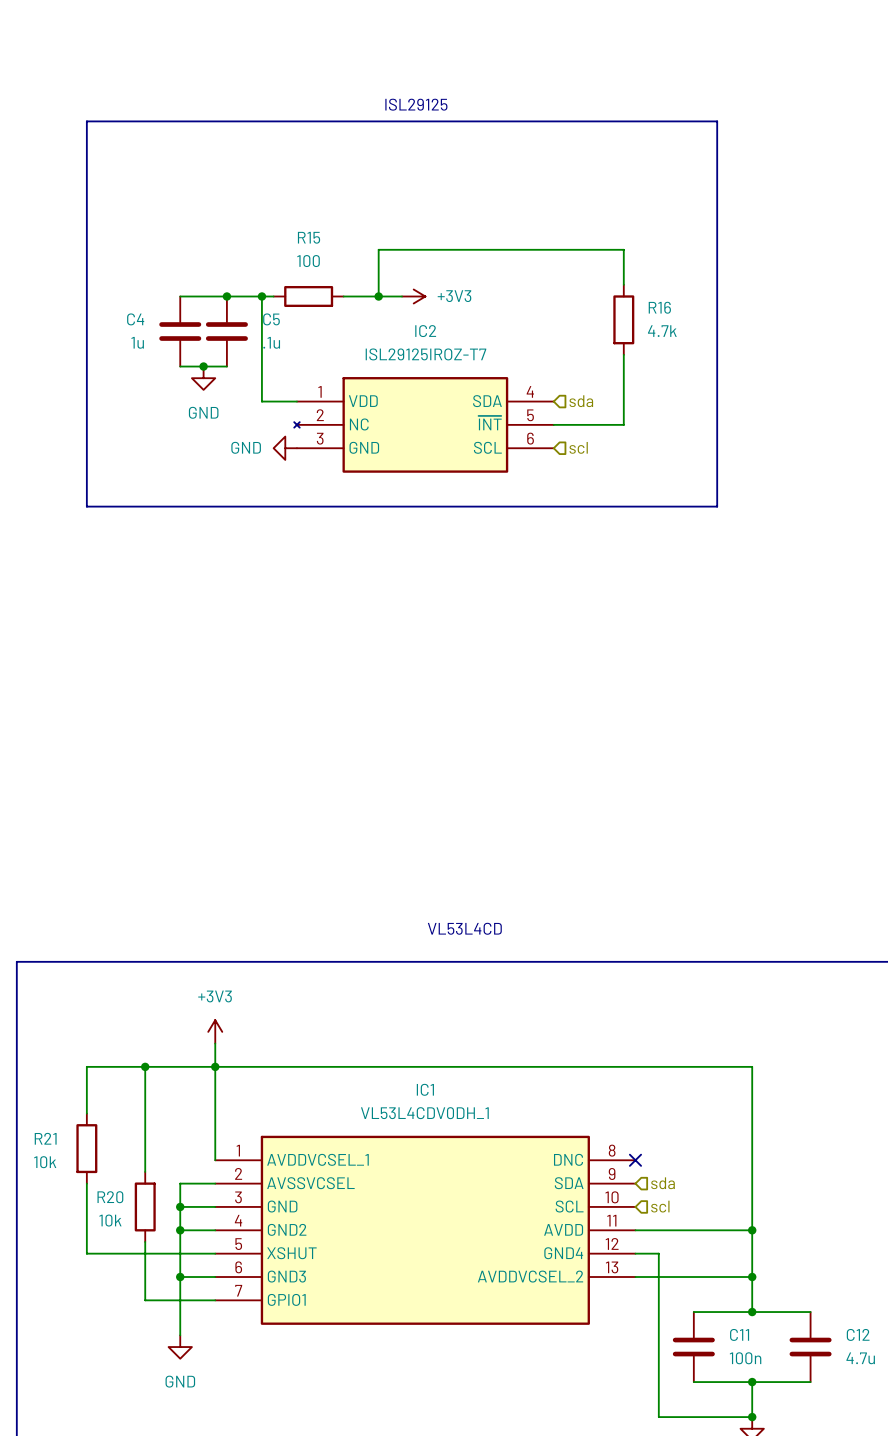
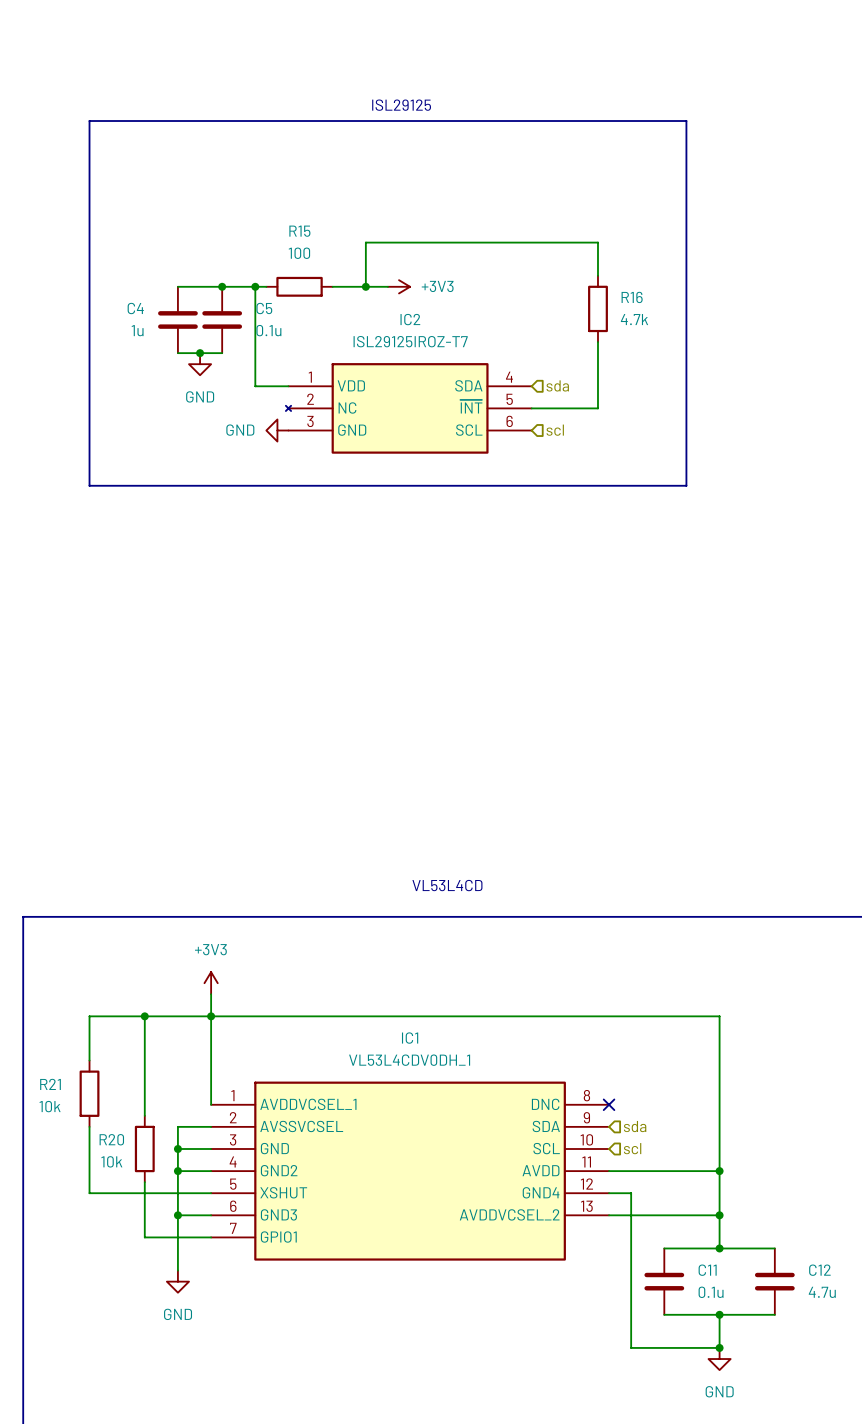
C5 value: .1u (271, 342) -> 0.1u (268, 330)
C11 value: 100n (745, 1358) -> 0.1u (711, 1292)

